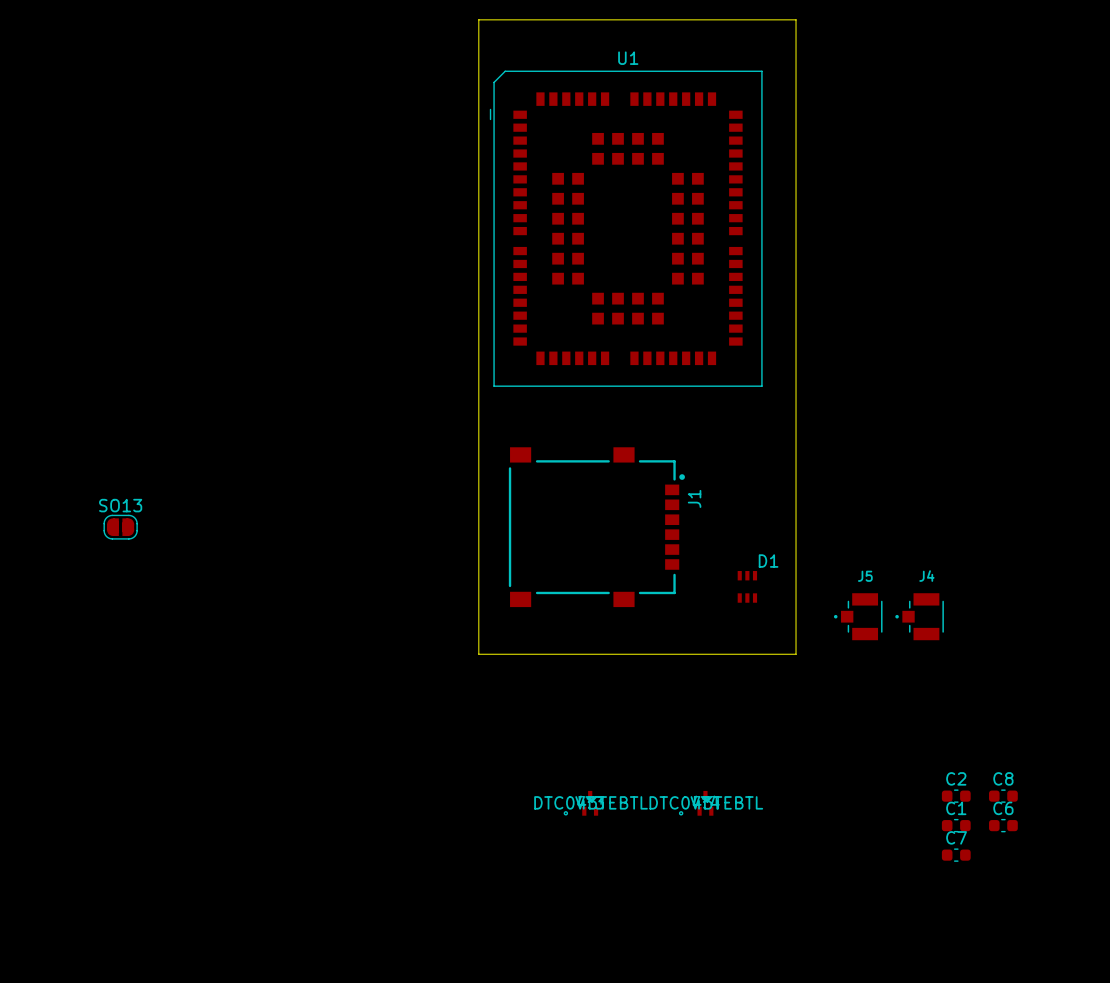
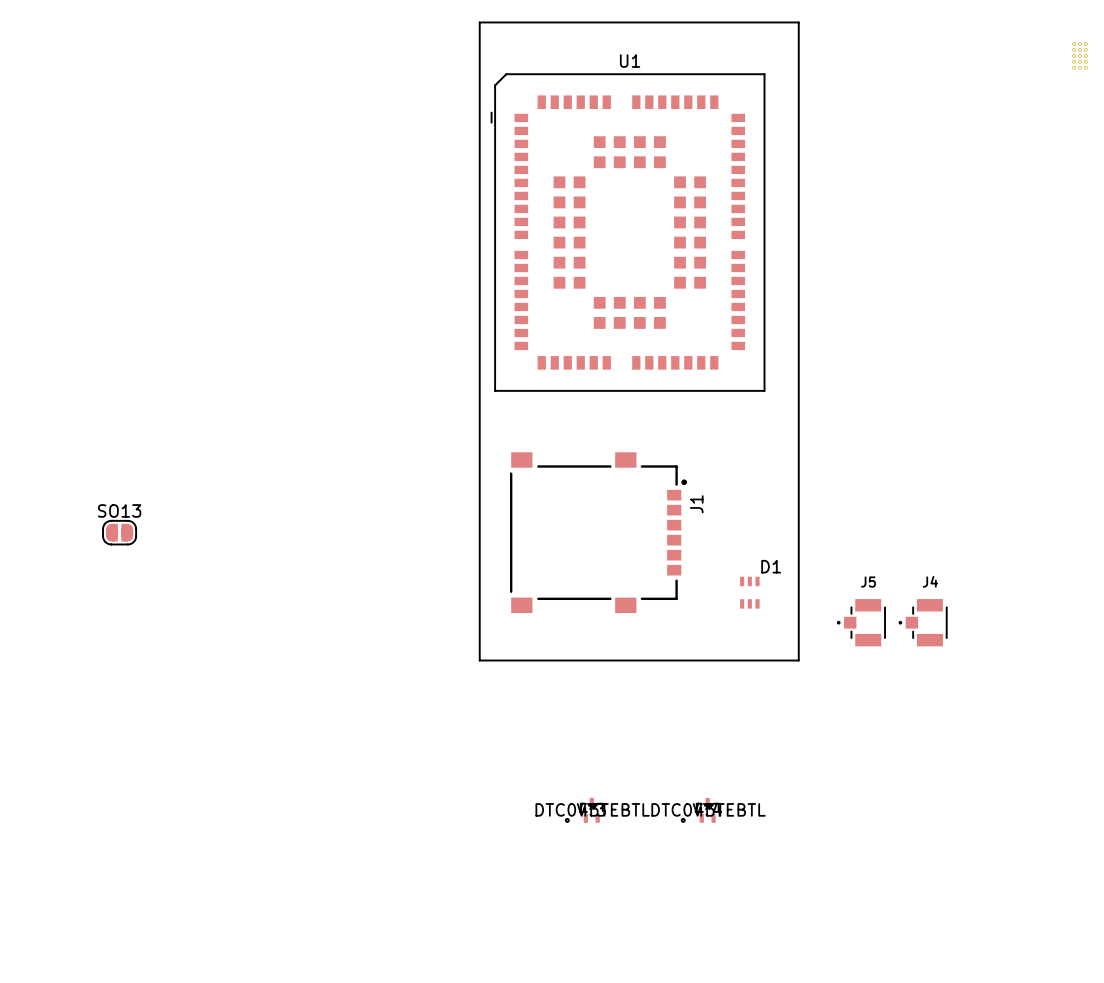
part: none -> (1079, 55)
C2: (956, 796) -> none
C8: (1003, 796) -> none
C1: (956, 825) -> none
C6: (1003, 825) -> none
C7: (956, 855) -> none

